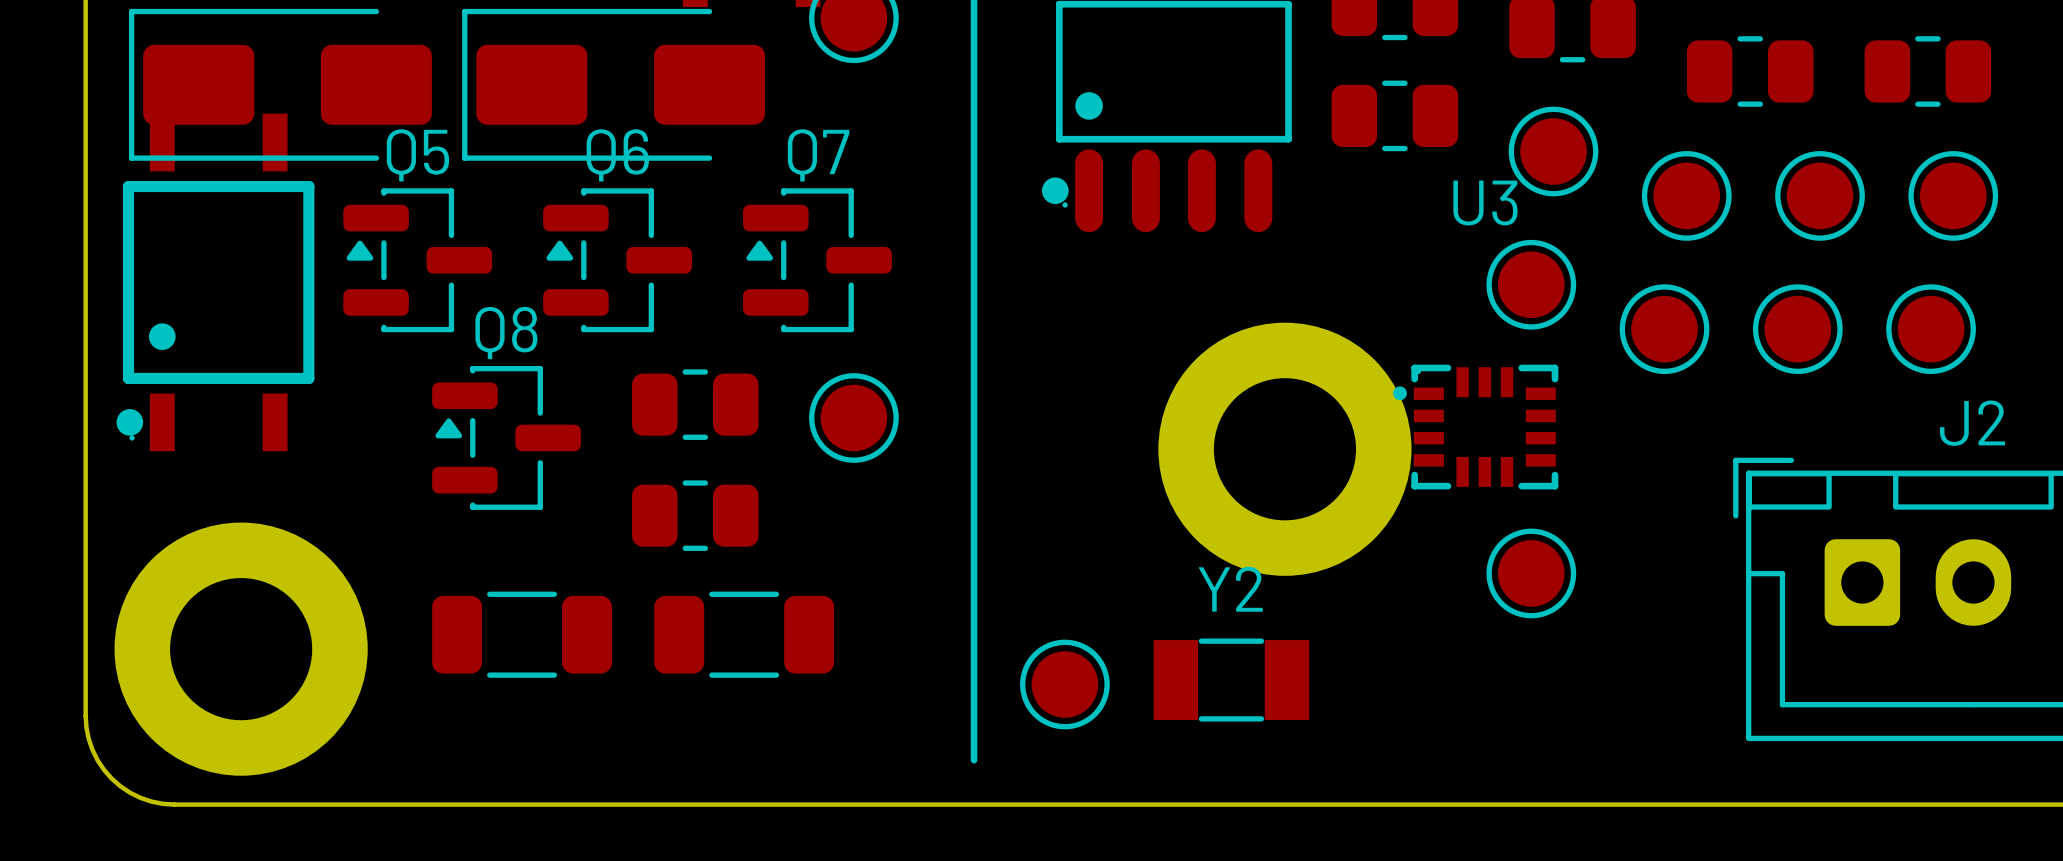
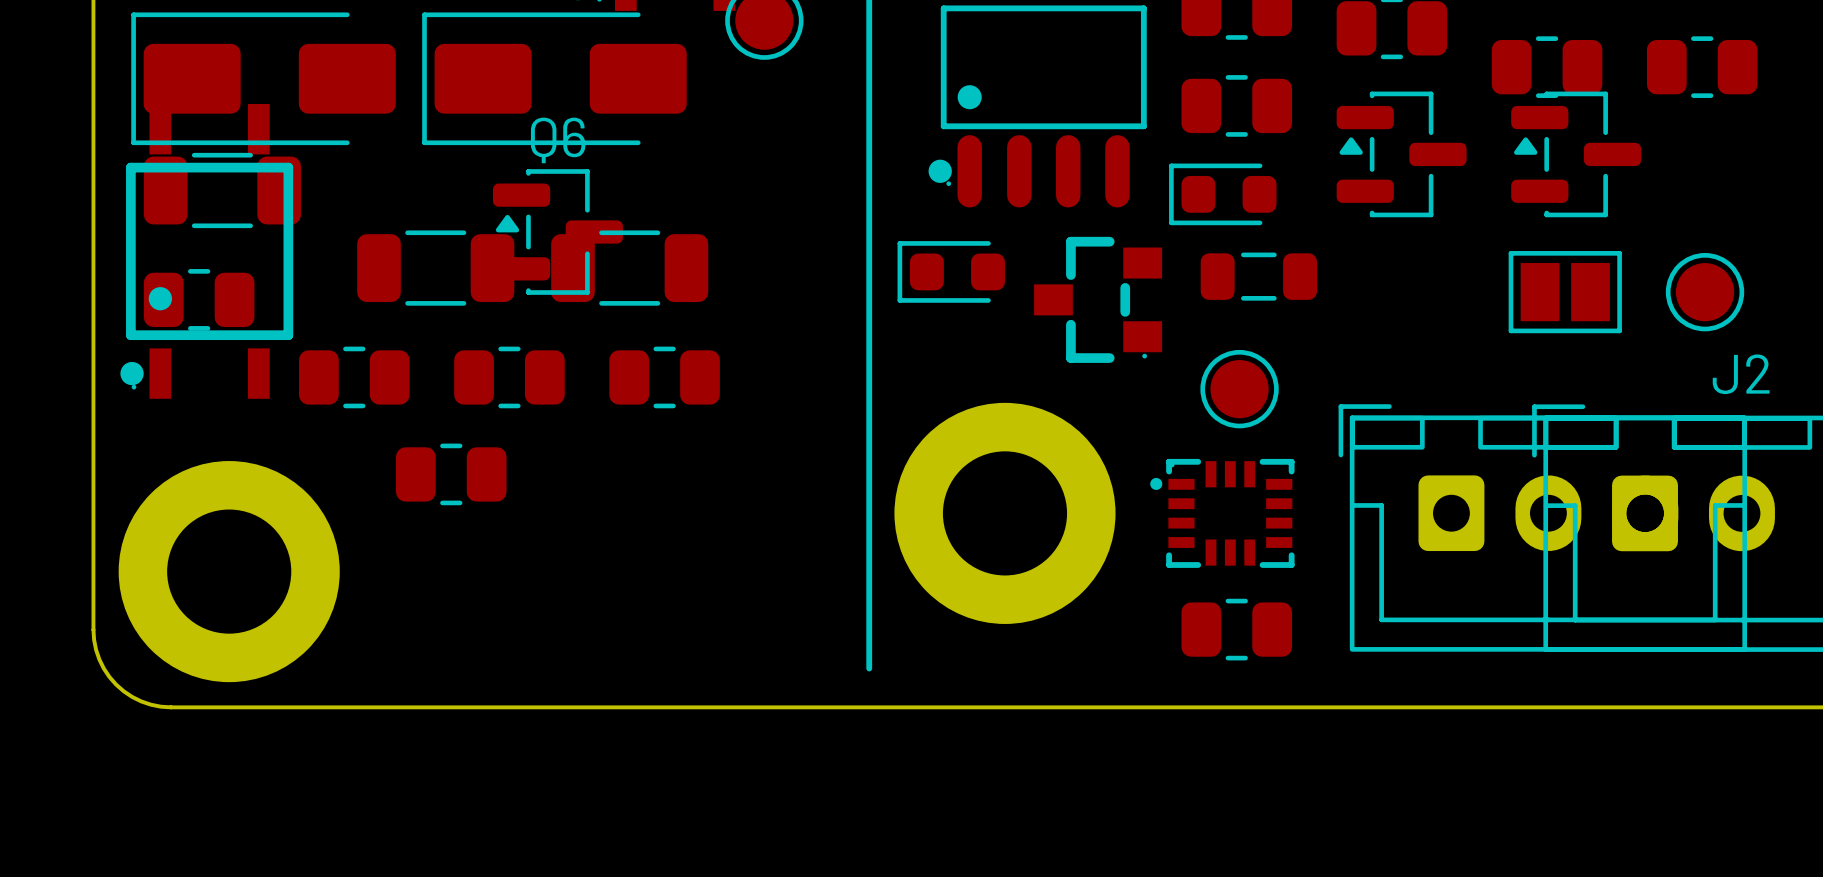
part footprint: [1508, 106, 1599, 197] -> [1336, 91, 1467, 218]
part footprint: [1775, 151, 1865, 241] -> [1511, 91, 1642, 218]
part: (1686, 195) -> none
part: (1953, 195) -> none
part: none -> (222, 190)
part: none -> (1222, 194)
Q5: (417, 260) -> none
Q7: (817, 260) -> none
part: (1531, 284) -> none
part footprint: [1752, 284, 1843, 375] -> [1508, 251, 1622, 334]
part: none -> (435, 268)
part: none -> (629, 268)
part: none -> (951, 271)
part: none -> (1258, 276)
part: (1664, 329) -> none
part: none -> (199, 299)
part: none -> (1098, 299)
part: (695, 404) -> none
part: (853, 418) -> none
part: none -> (354, 377)
part: none -> (509, 377)
part: none -> (664, 377)
U3: (1475, 427) -> none
Q8: (506, 437) -> none
part: none -> (1239, 389)
part position: (1284, 449) -> (1004, 513)
part: (695, 515) -> none
part: none -> (451, 474)
part: (1531, 573) -> none
part: none -> (1222, 513)
part: none -> (1542, 527)
part: (522, 634) -> none
part: (744, 634) -> none
Y2: (1231, 680) -> none
part: (1064, 684) -> none
part: none -> (1236, 629)

